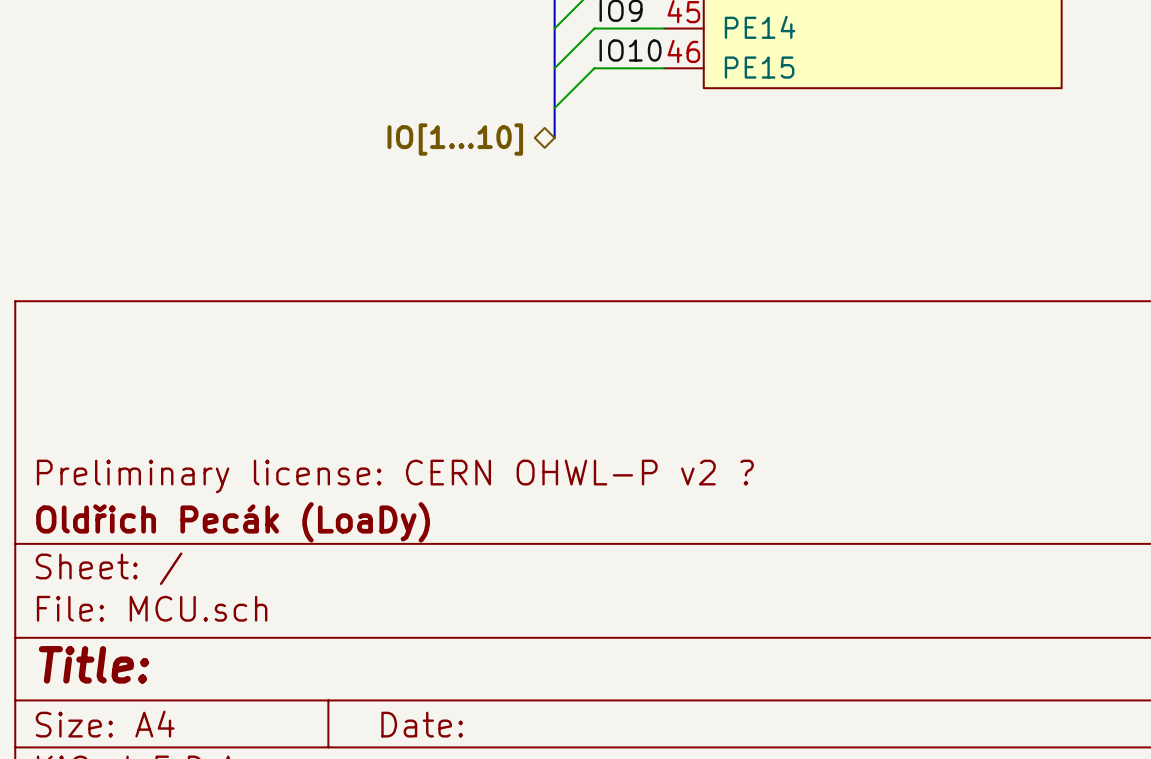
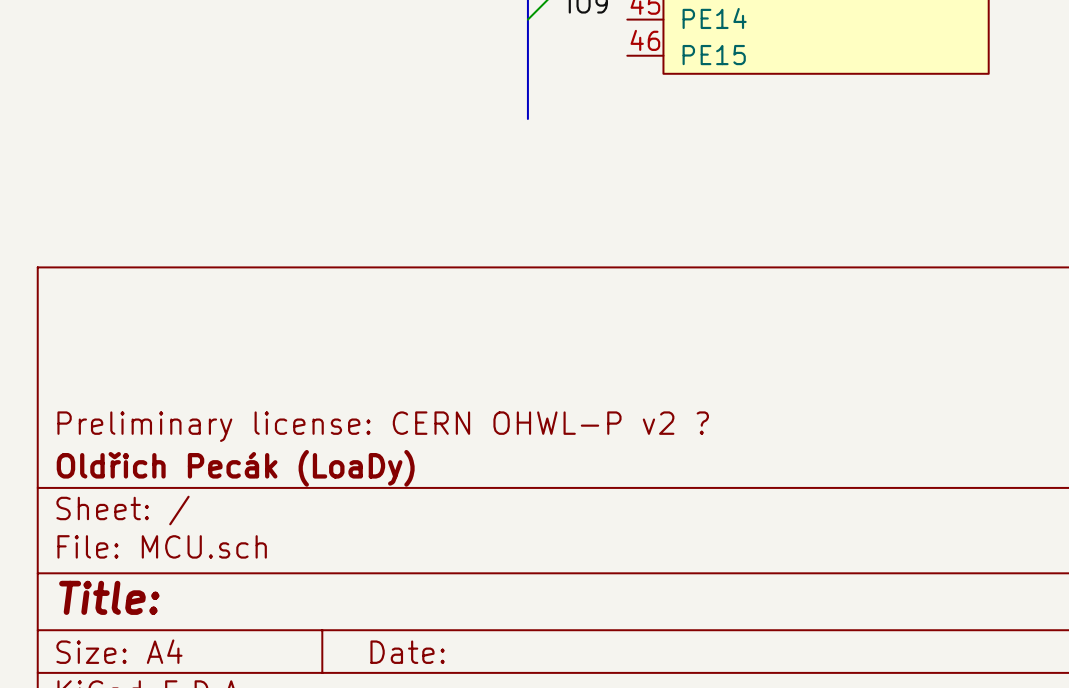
wire: (663, 28) (594, 28) (554, 68) -> none
label: IO10 (630, 50) -> none
wire: (663, 68) (594, 68) (554, 108) -> none
hierarchical label: IO[1...10] (455, 139) -> none

